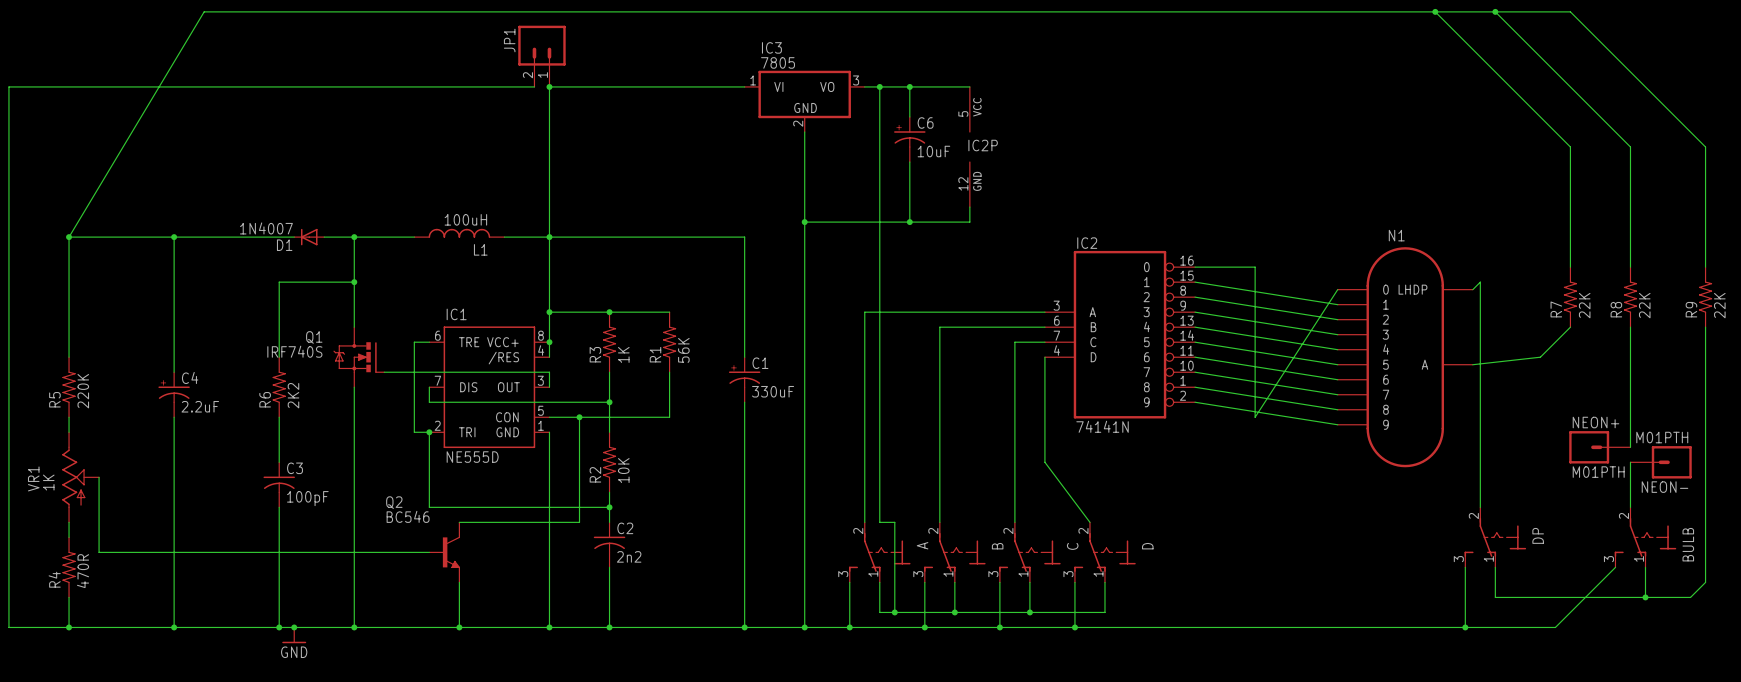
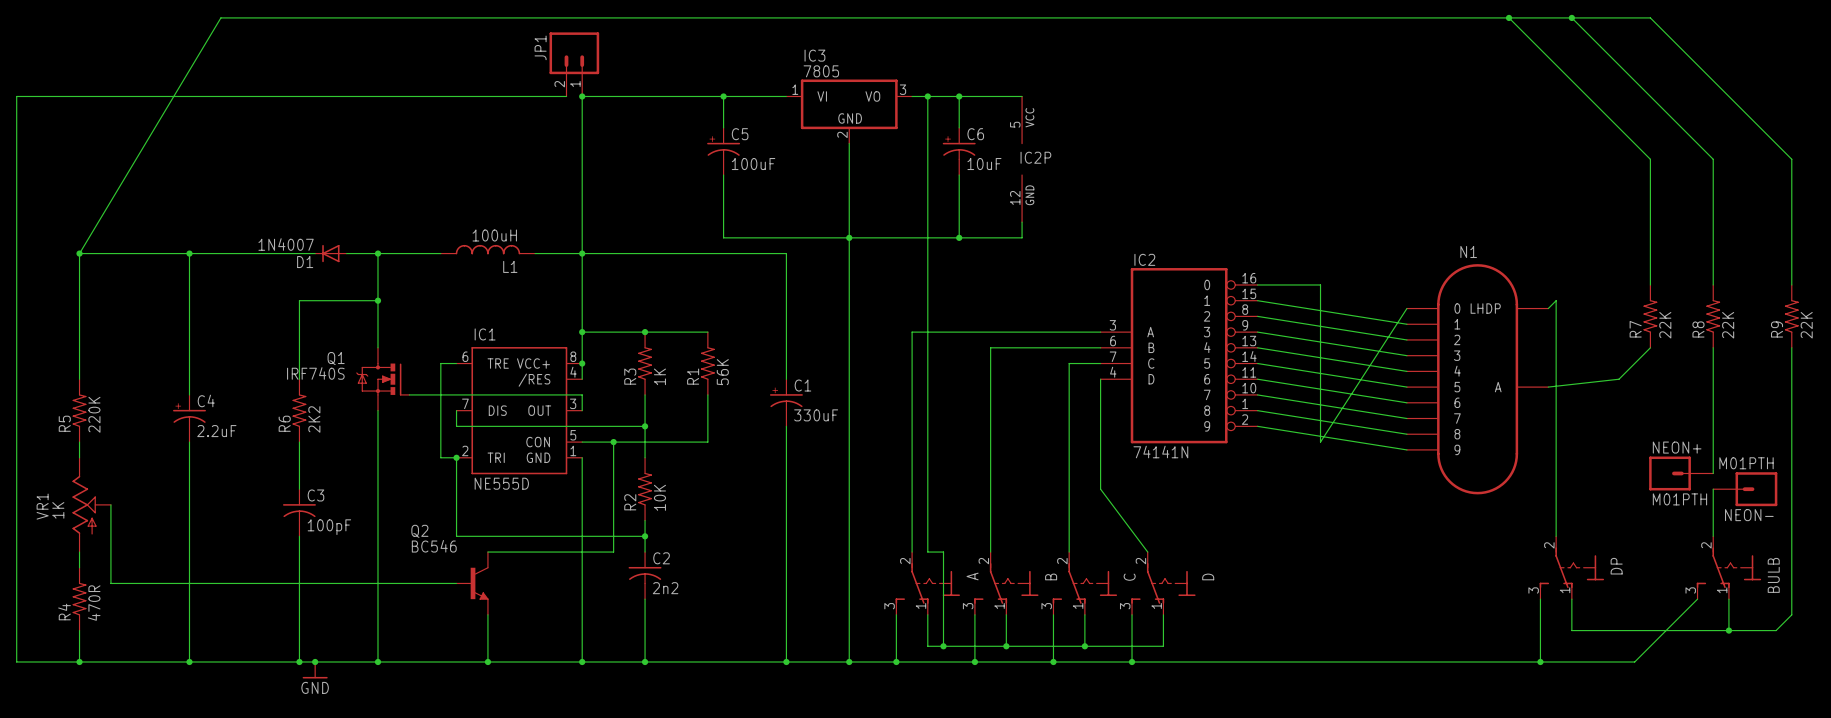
wire: none -> (723, 96) (723, 127)
junction: none -> (723, 96)
C5: none -> 100uF (723, 151)
wire: none -> (723, 175) (723, 237) (849, 237)

